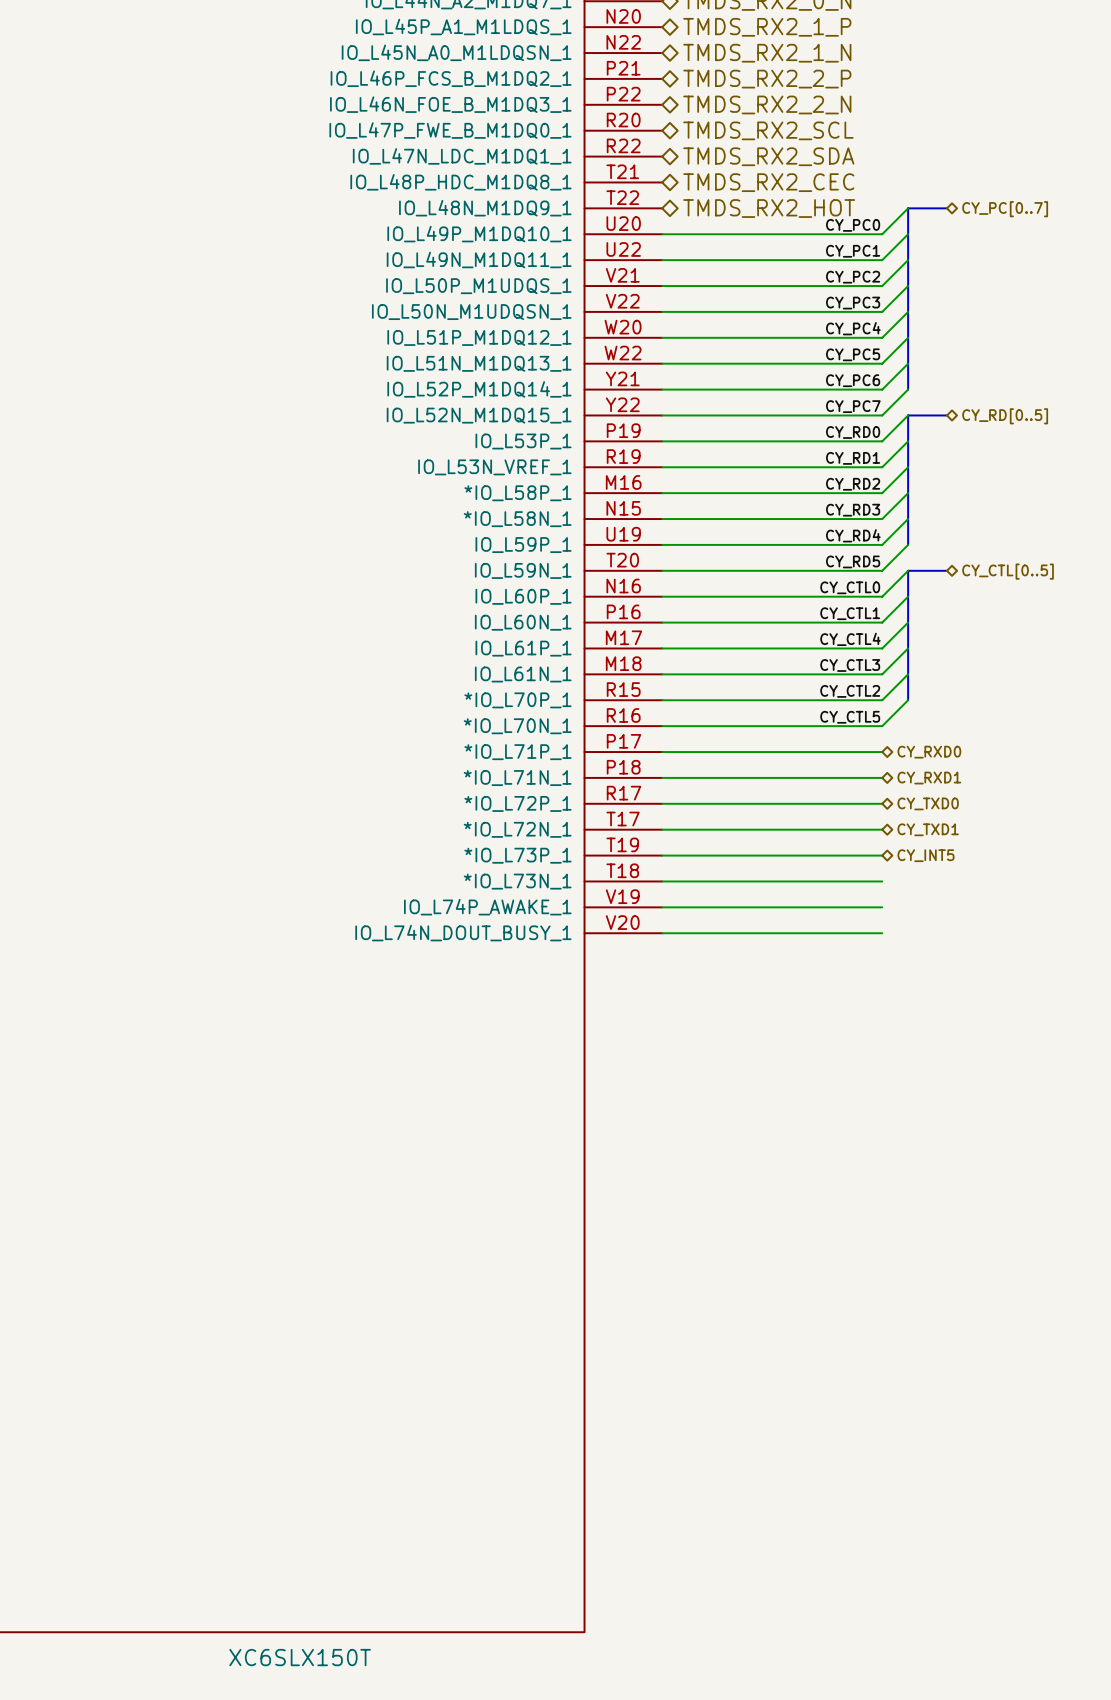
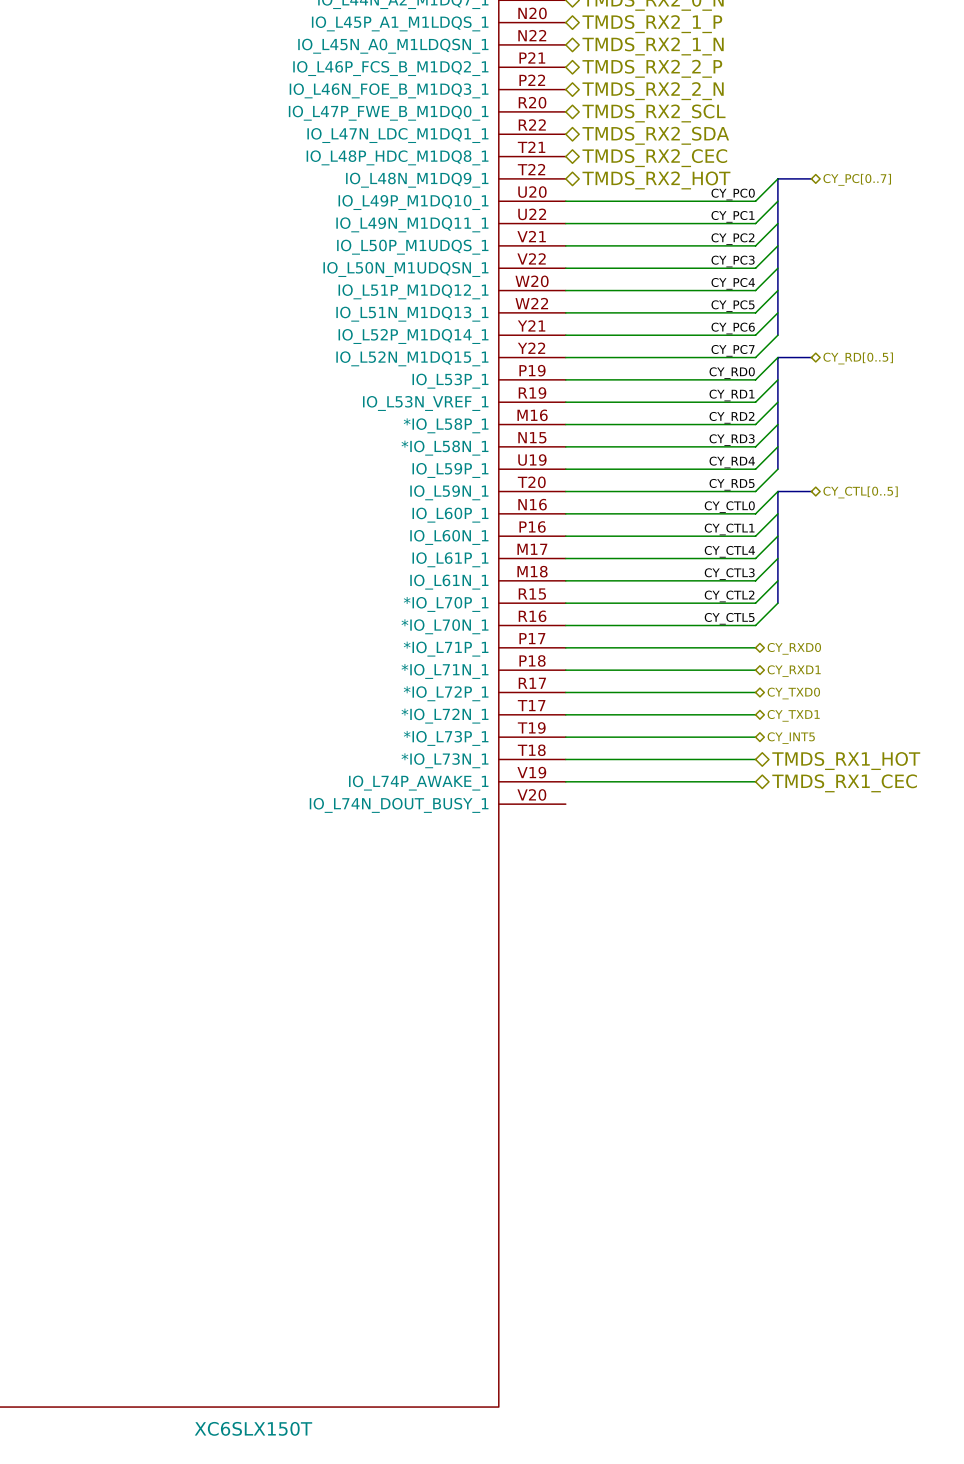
hierarchical label: none -> TMDS_RX1_HOT (846, 761)
hierarchical label: none -> TMDS_RX1_CEC (844, 783)
wire: (662, 933) (882, 933) -> none

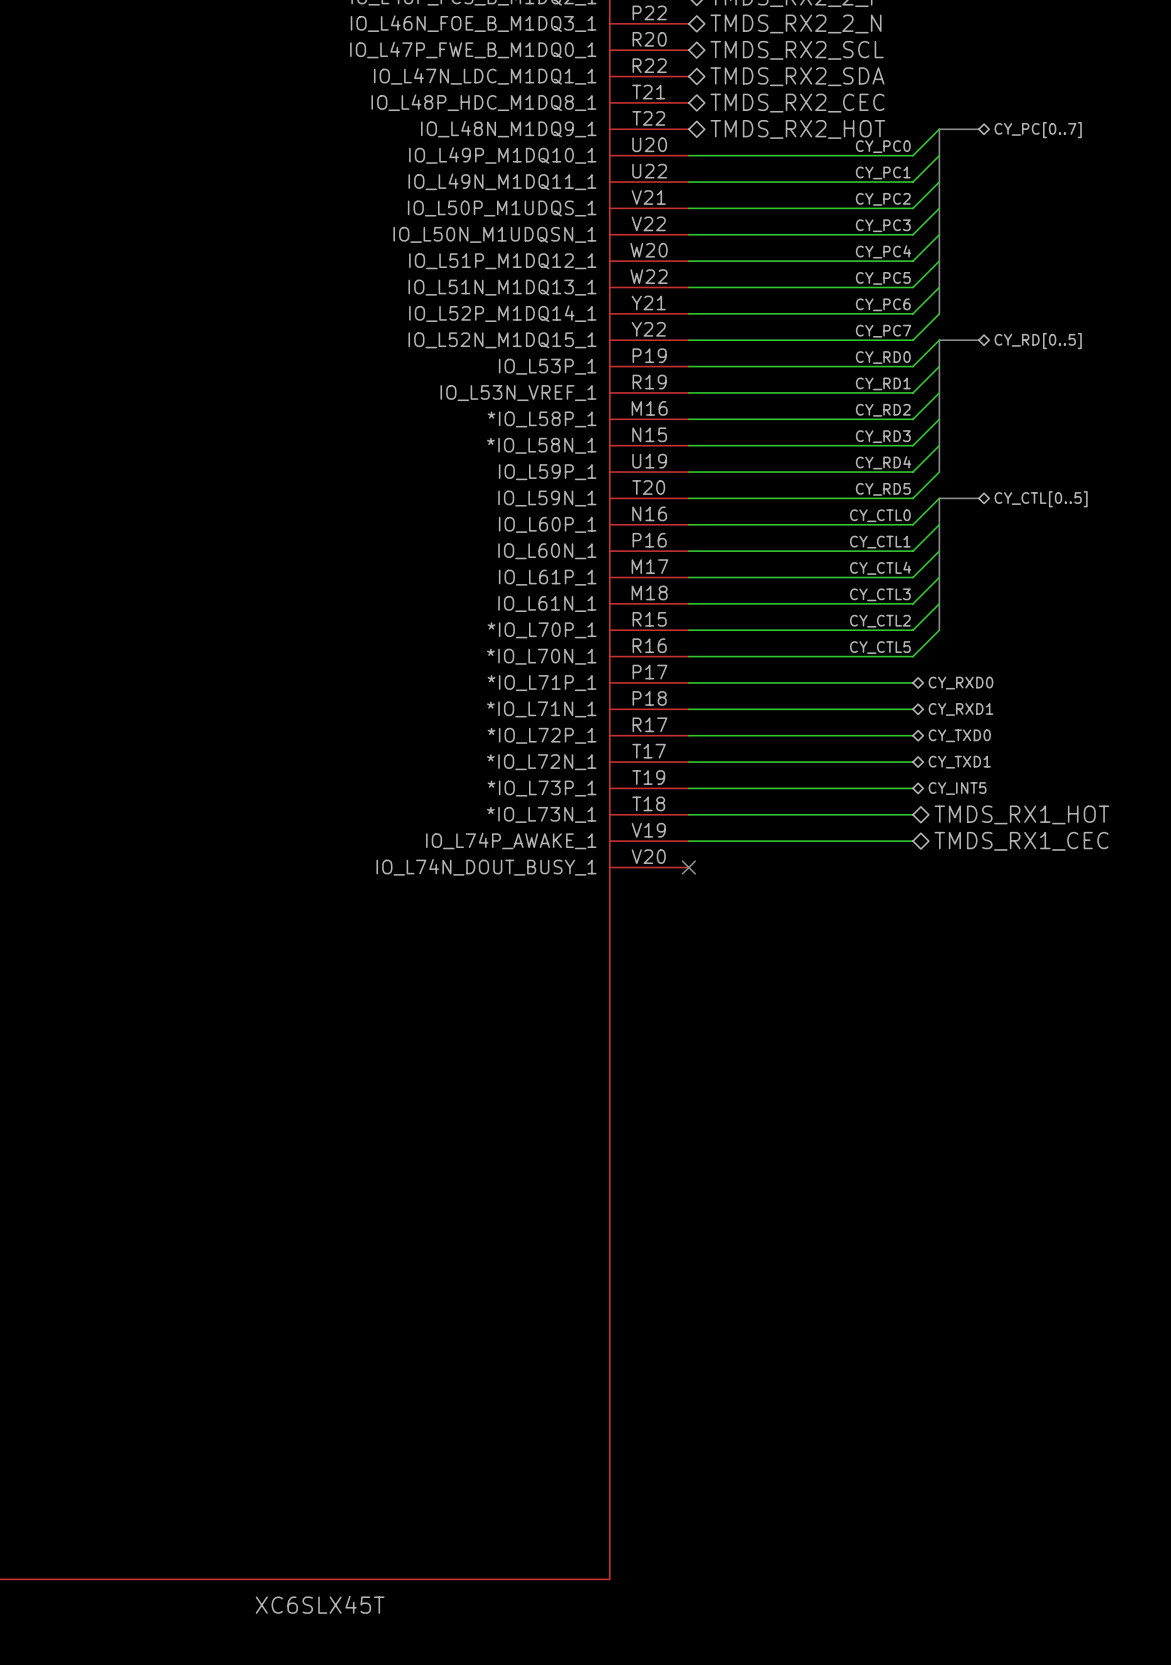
no-connect mark: none -> (688, 867)
part value: XC6SLX150T (253, 1428) -> XC6SLX45T (320, 1604)

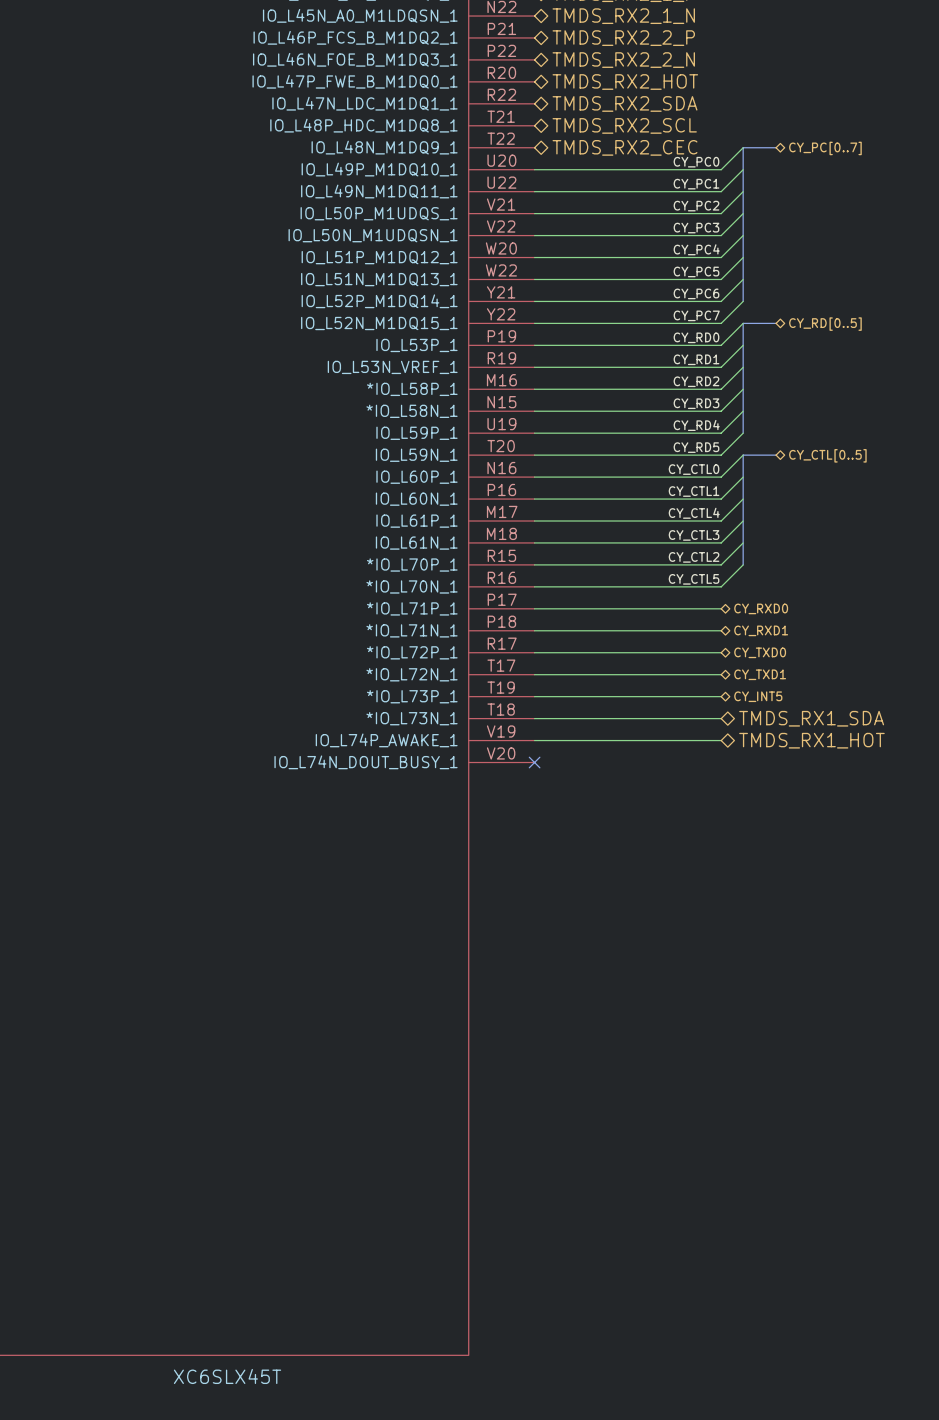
hierarchical label: TMDS_RX2_SCL (797, 50) -> TMDS_RX2_HOT (625, 82)
hierarchical label: TMDS_RX2_CEC (797, 103) -> TMDS_RX2_SCL (624, 125)
hierarchical label: TMDS_RX2_HOT (797, 129) -> TMDS_RX2_CEC (625, 147)
hierarchical label: TMDS_RX1_HOT (1021, 814) -> TMDS_RX1_SDA (811, 718)
hierarchical label: TMDS_RX1_CEC (1021, 841) -> TMDS_RX1_HOT (811, 740)

